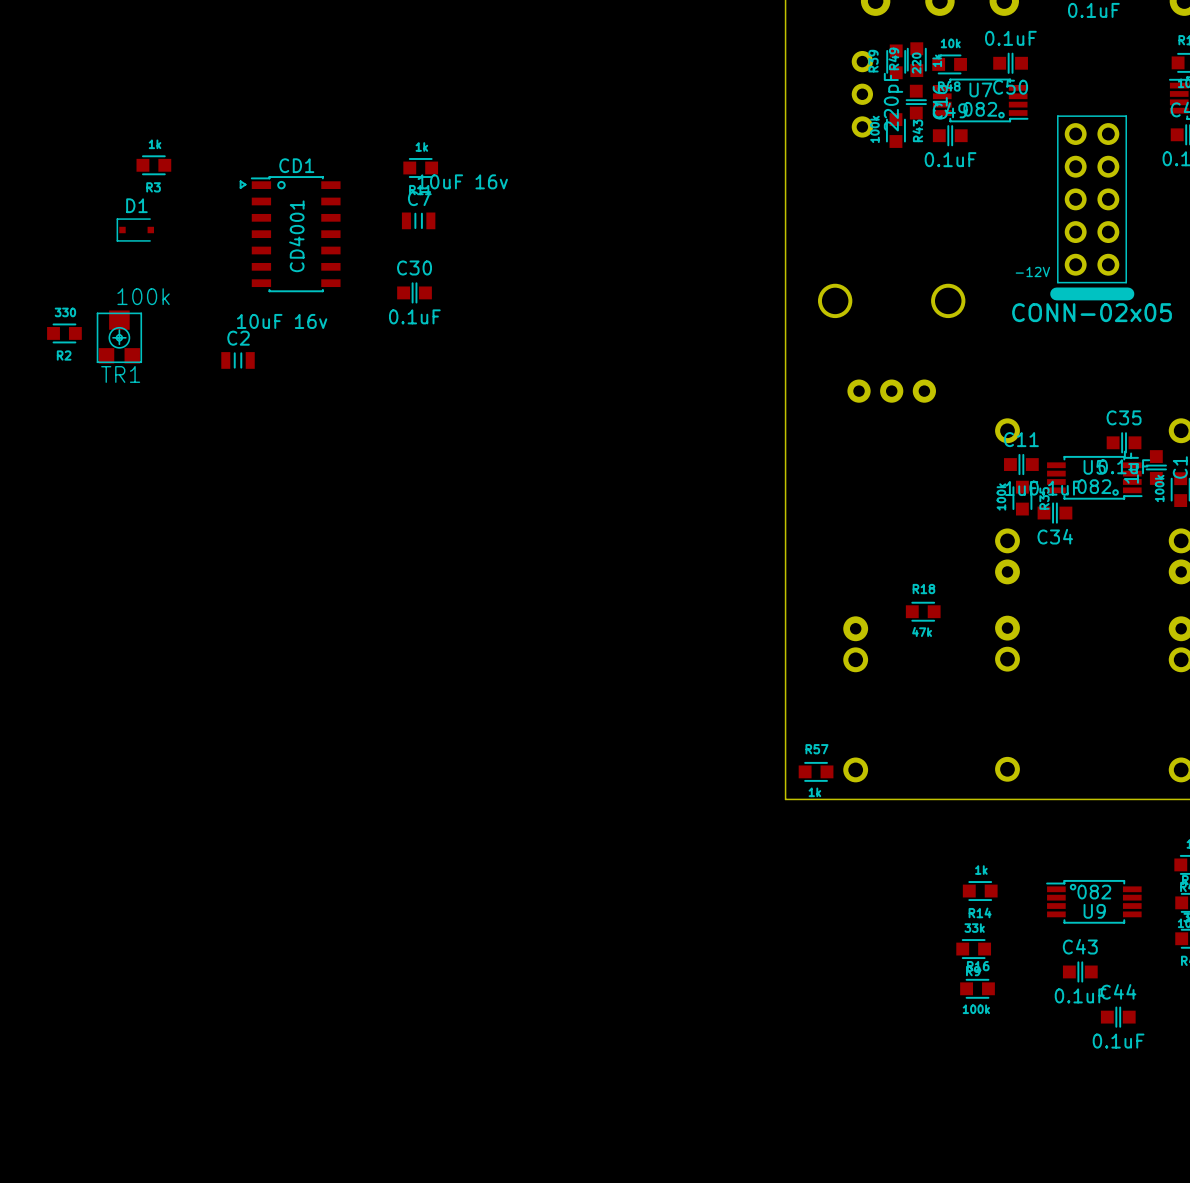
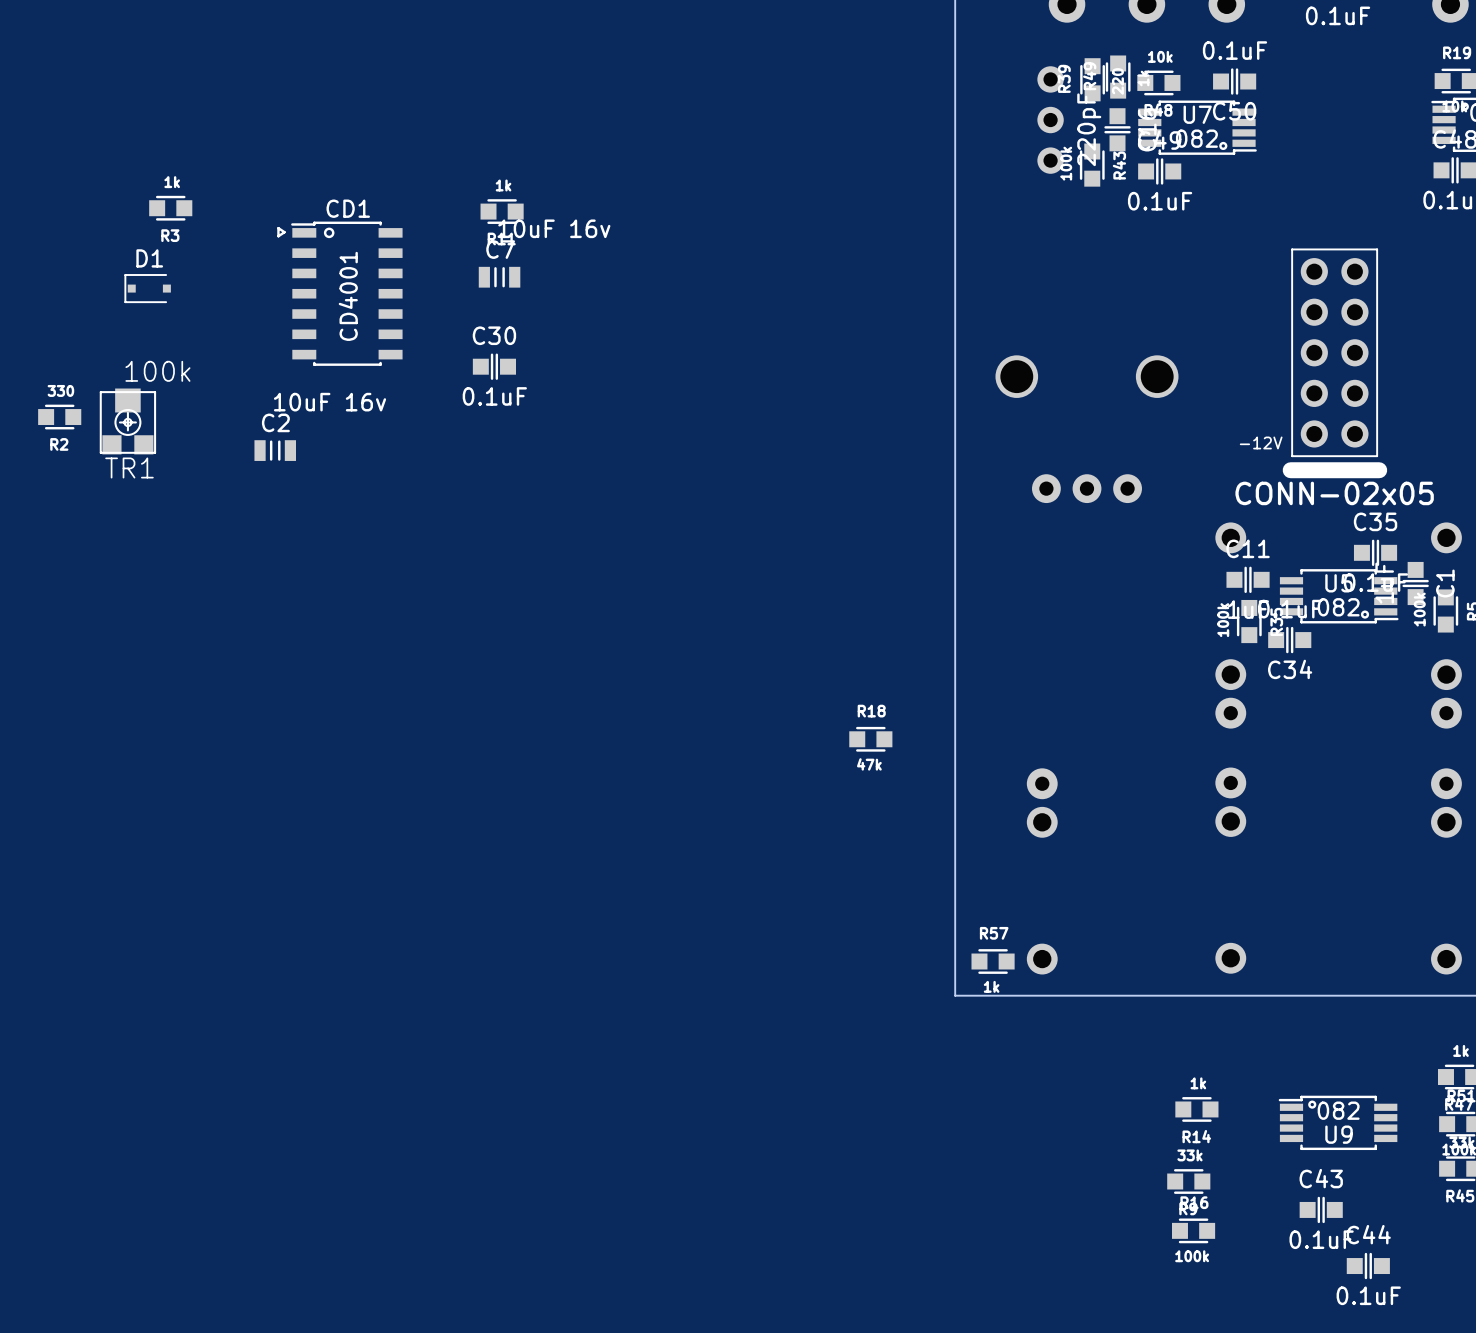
part position: (1092, 207) -> (1334, 363)
R18 position: (923, 611) -> (870, 739)

